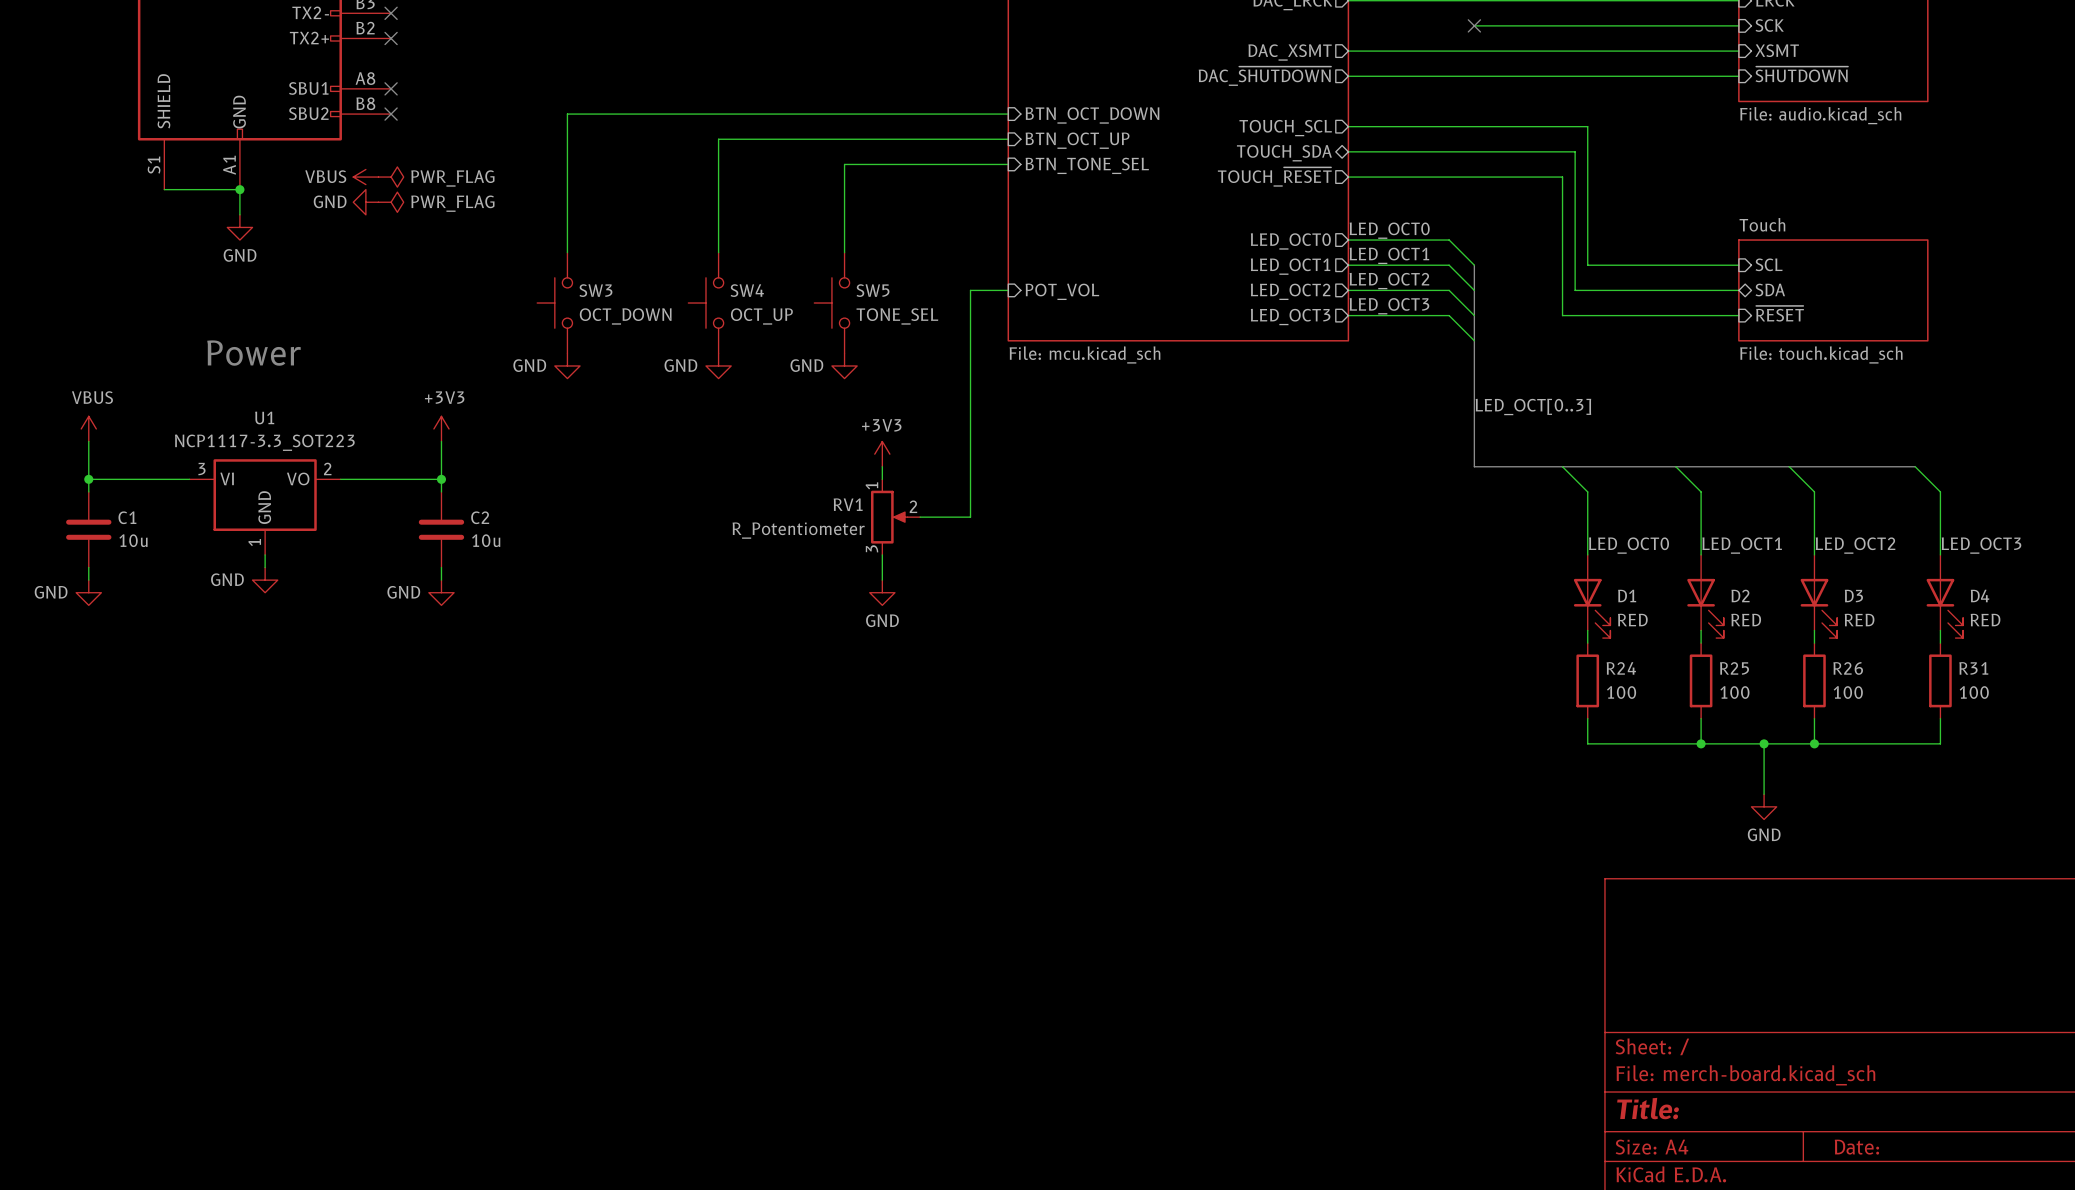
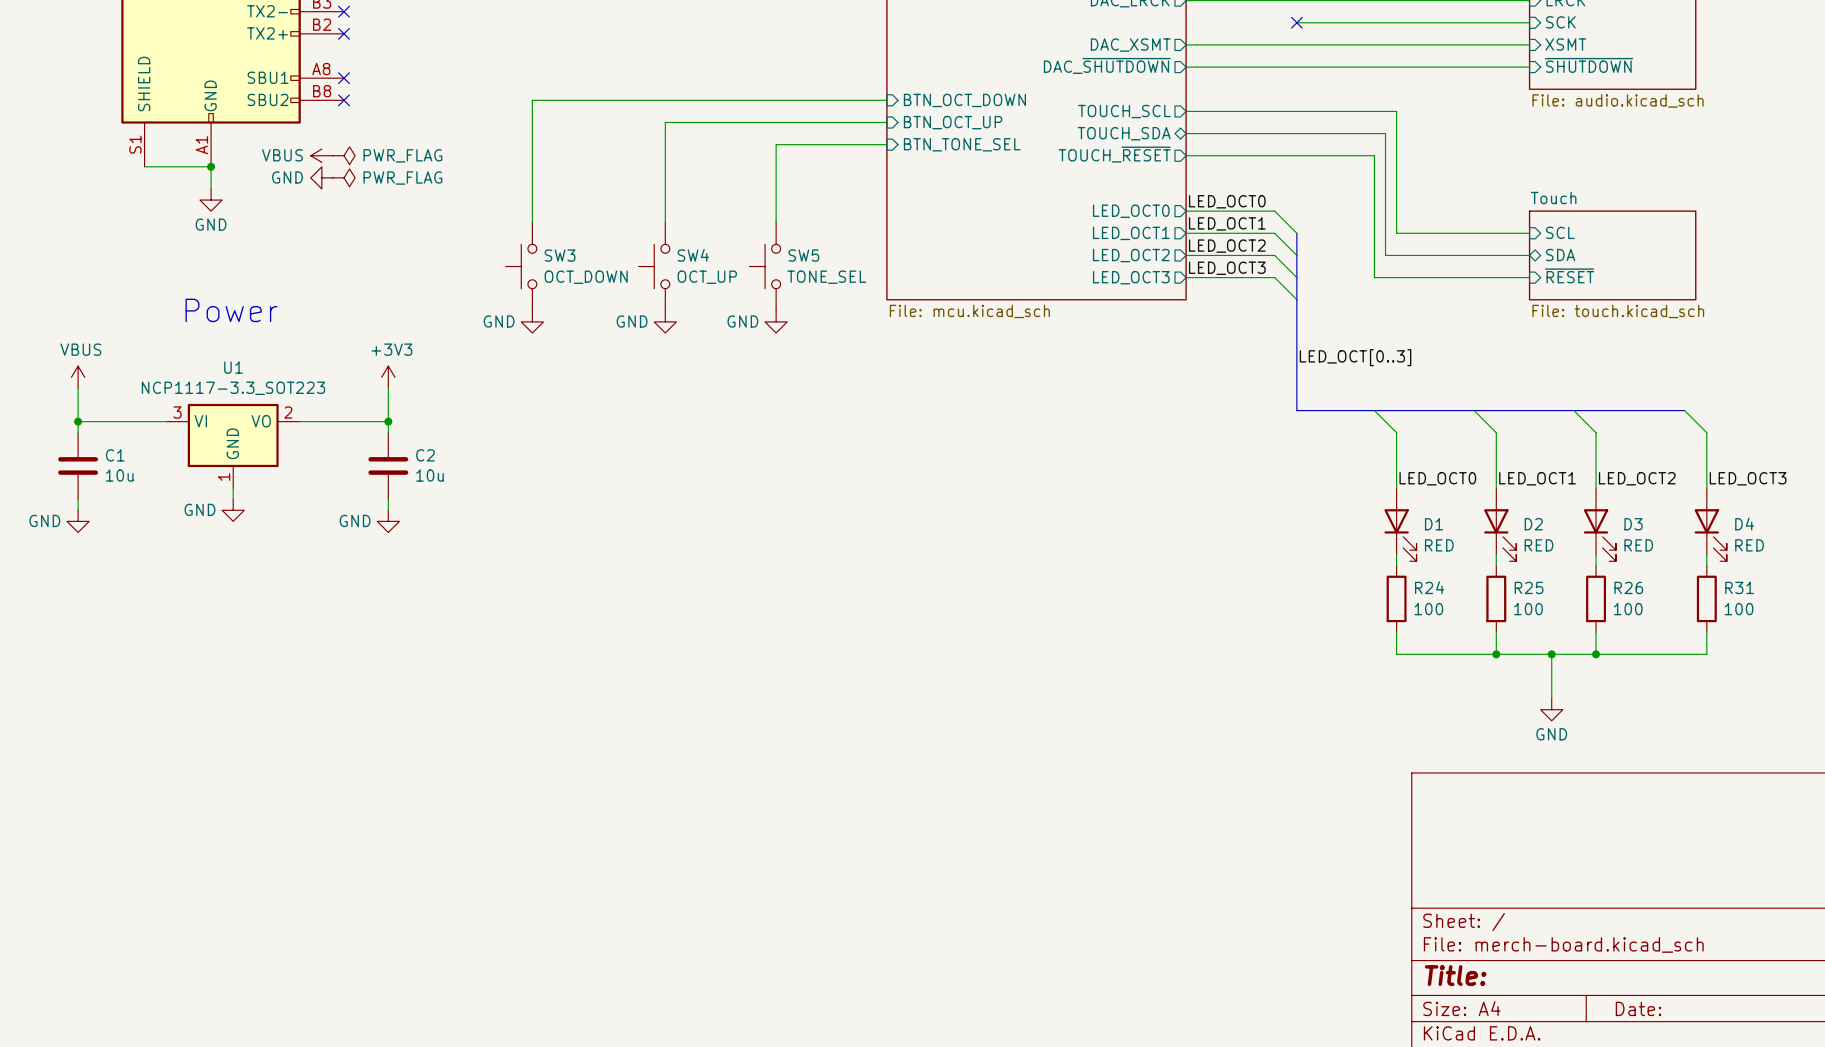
wire: (605, 114) (567, 114) (567, 252) -> (532, 100) (532, 222)
wire: (756, 139) (718, 139) (718, 252) -> (665, 122) (665, 222)
wire: (882, 164) (844, 164) (844, 252) -> (776, 144) (776, 222)
wire: (1008, 290) (970, 290) (970, 517) (920, 517) -> none
sheet pin: POT_VOL (1062, 291) -> none
SW3 position: (554, 303) -> (521, 266)
SW4 position: (705, 303) -> (654, 266)
SW5 position: (831, 303) -> (765, 266)
power symbol position: GND (567, 365) -> GND (532, 321)
power symbol position: GND (718, 365) -> GND (665, 321)
power symbol position: GND (844, 365) -> GND (776, 321)
power symbol: +3V3 (882, 454) -> none
wire: (882, 466) (882, 479) -> none
RV1: R_Potentiometer (895, 517) -> none
wire: (882, 554) (882, 580) -> none
power symbol: GND (882, 592) -> none

